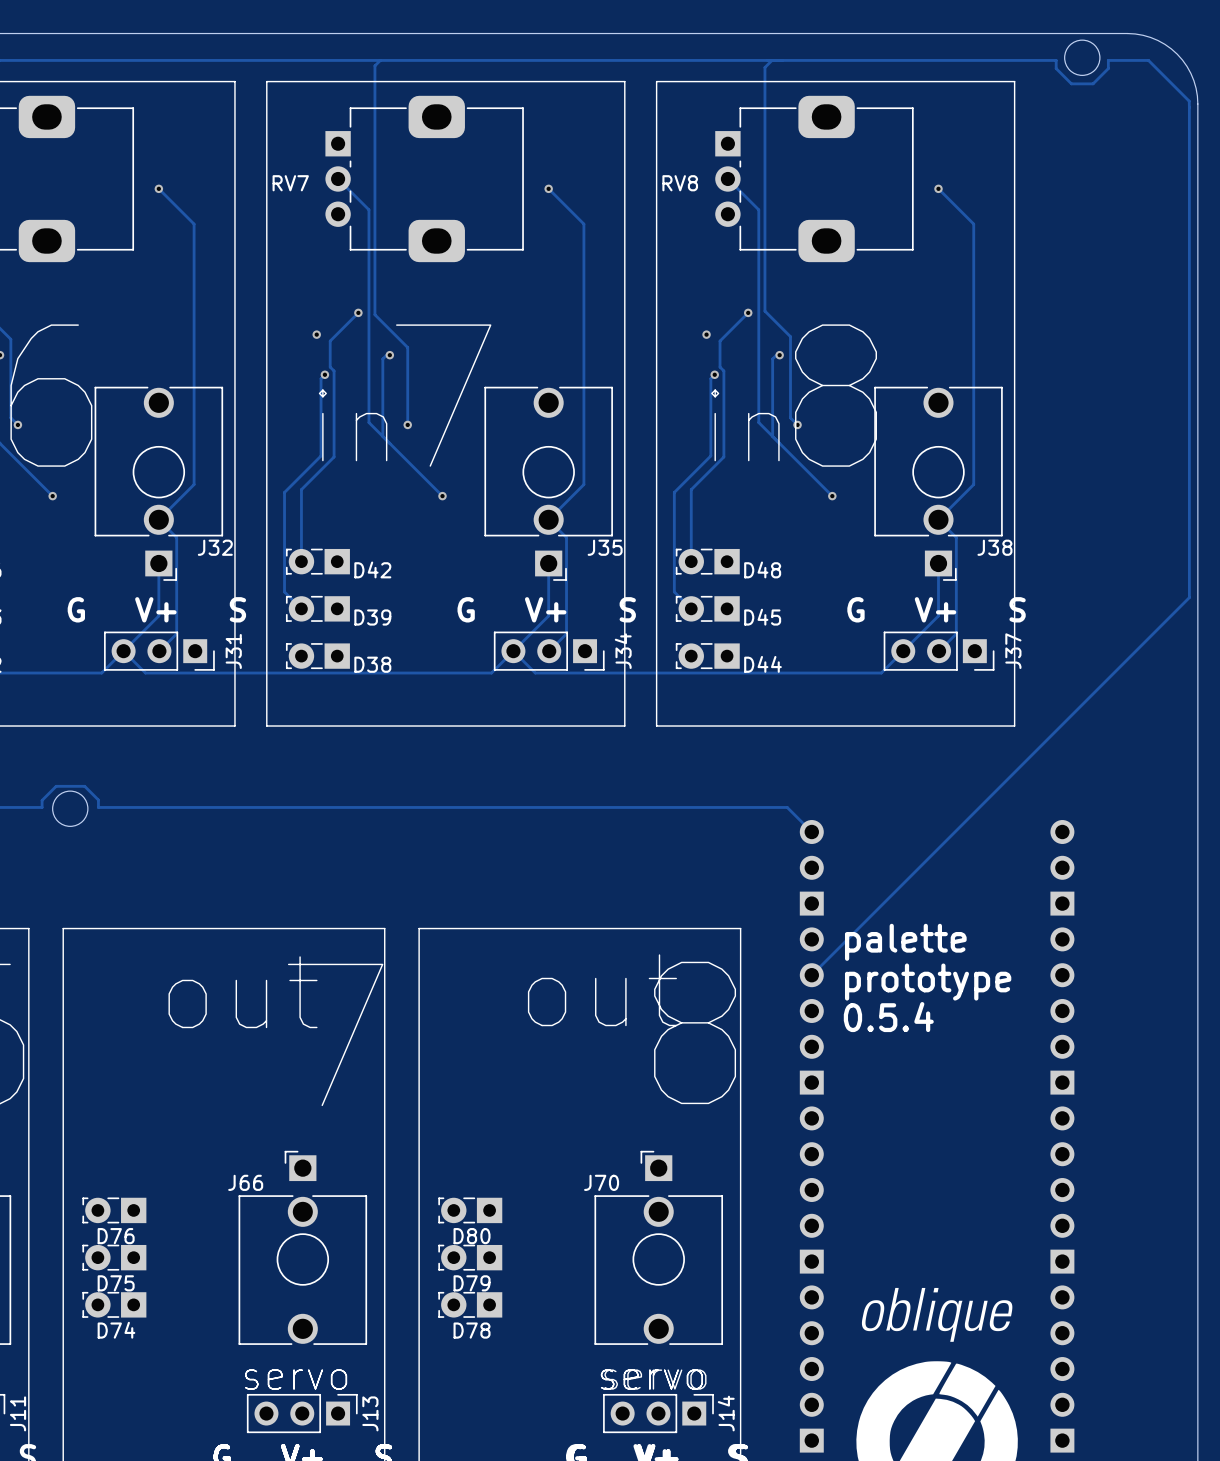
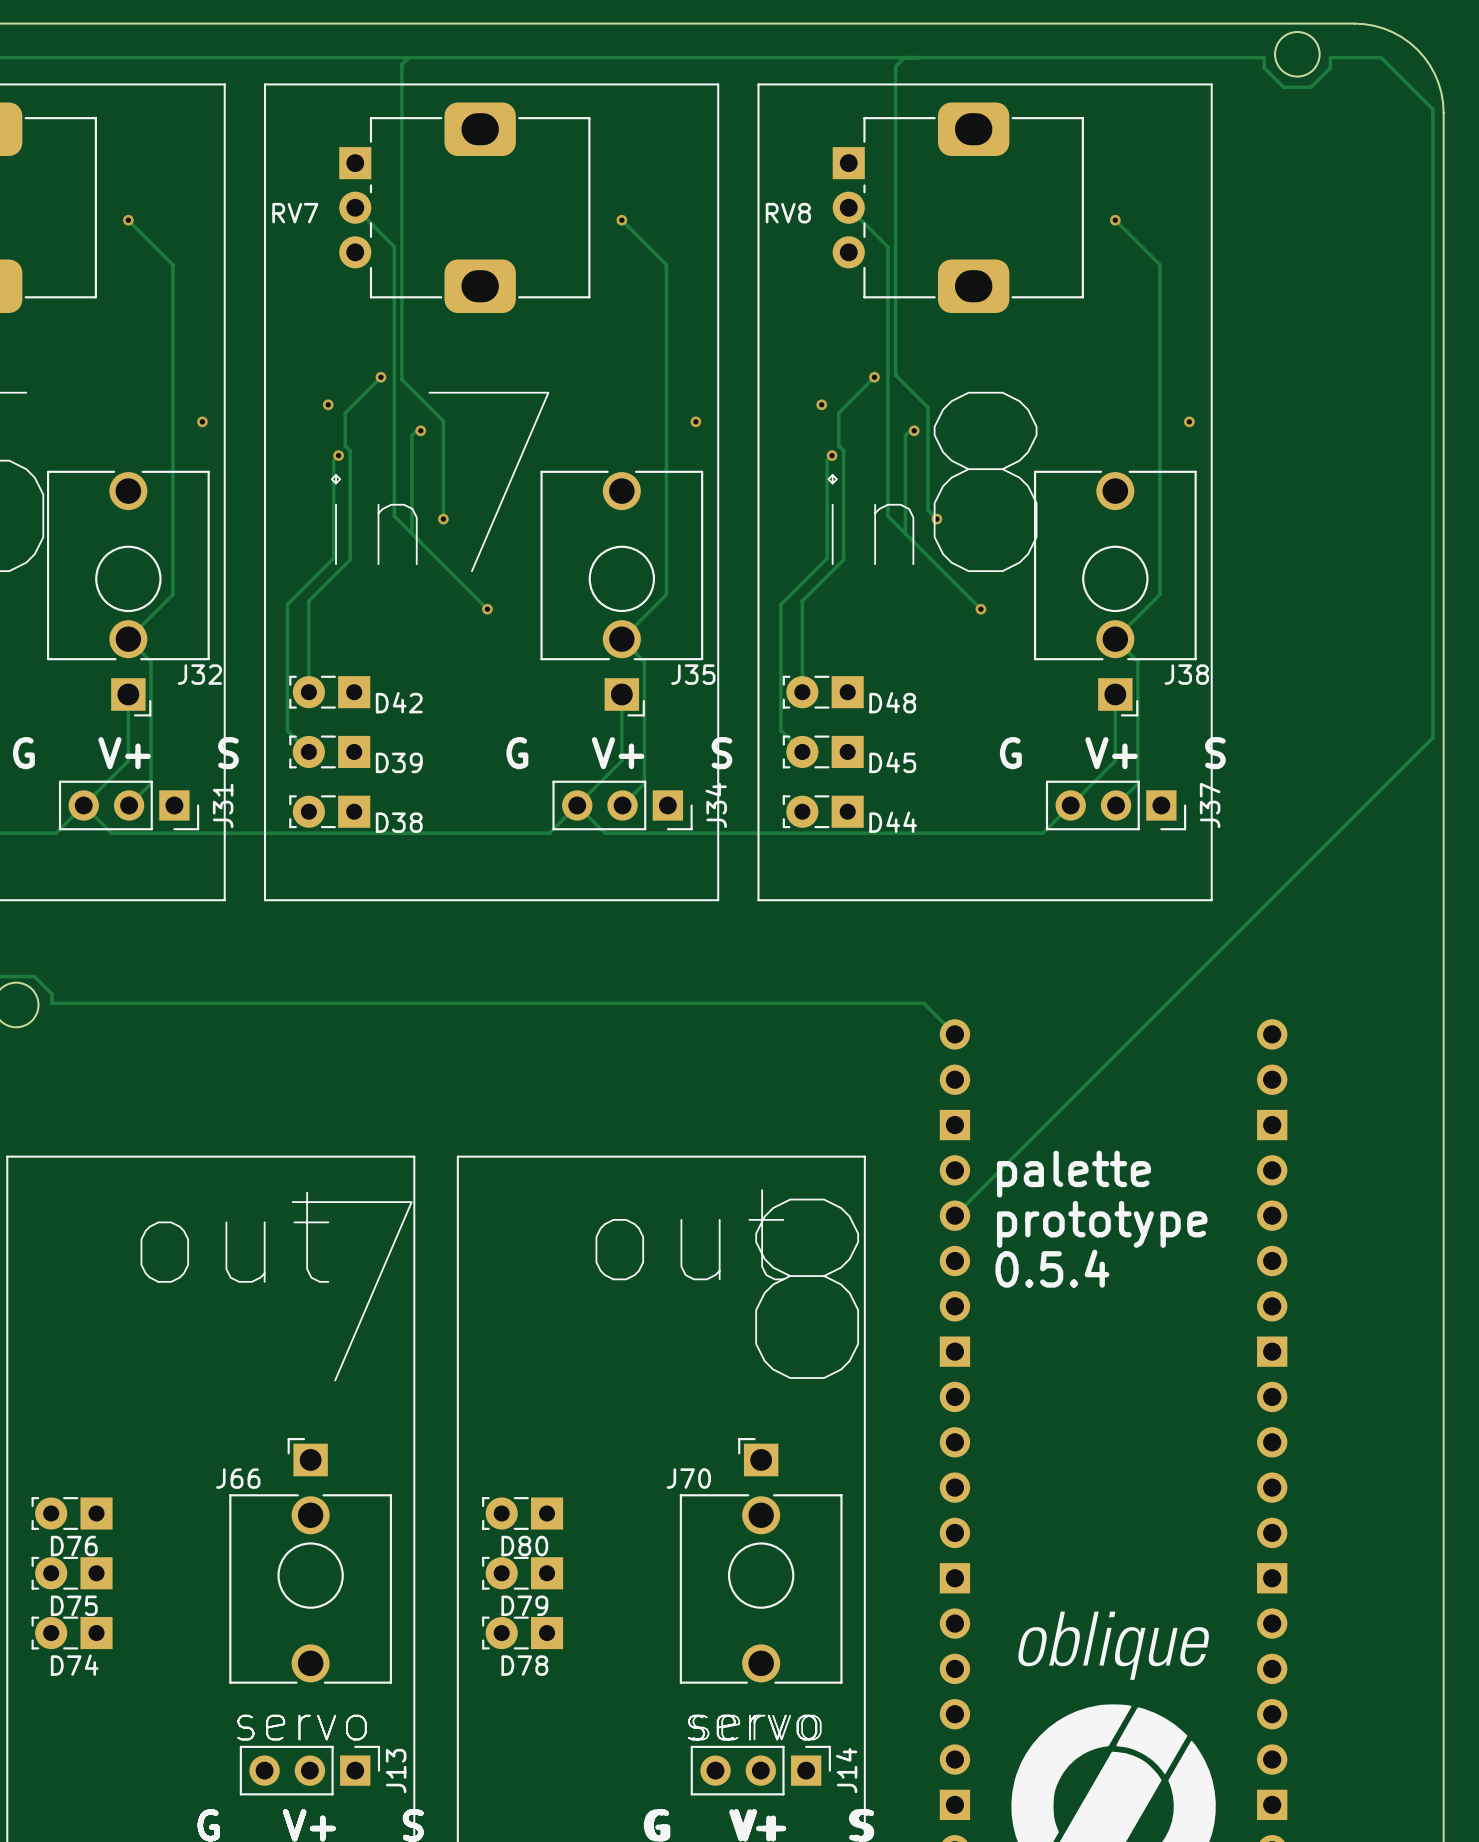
via: none -> (202, 421)
via: none -> (695, 421)
via: none -> (1189, 421)

